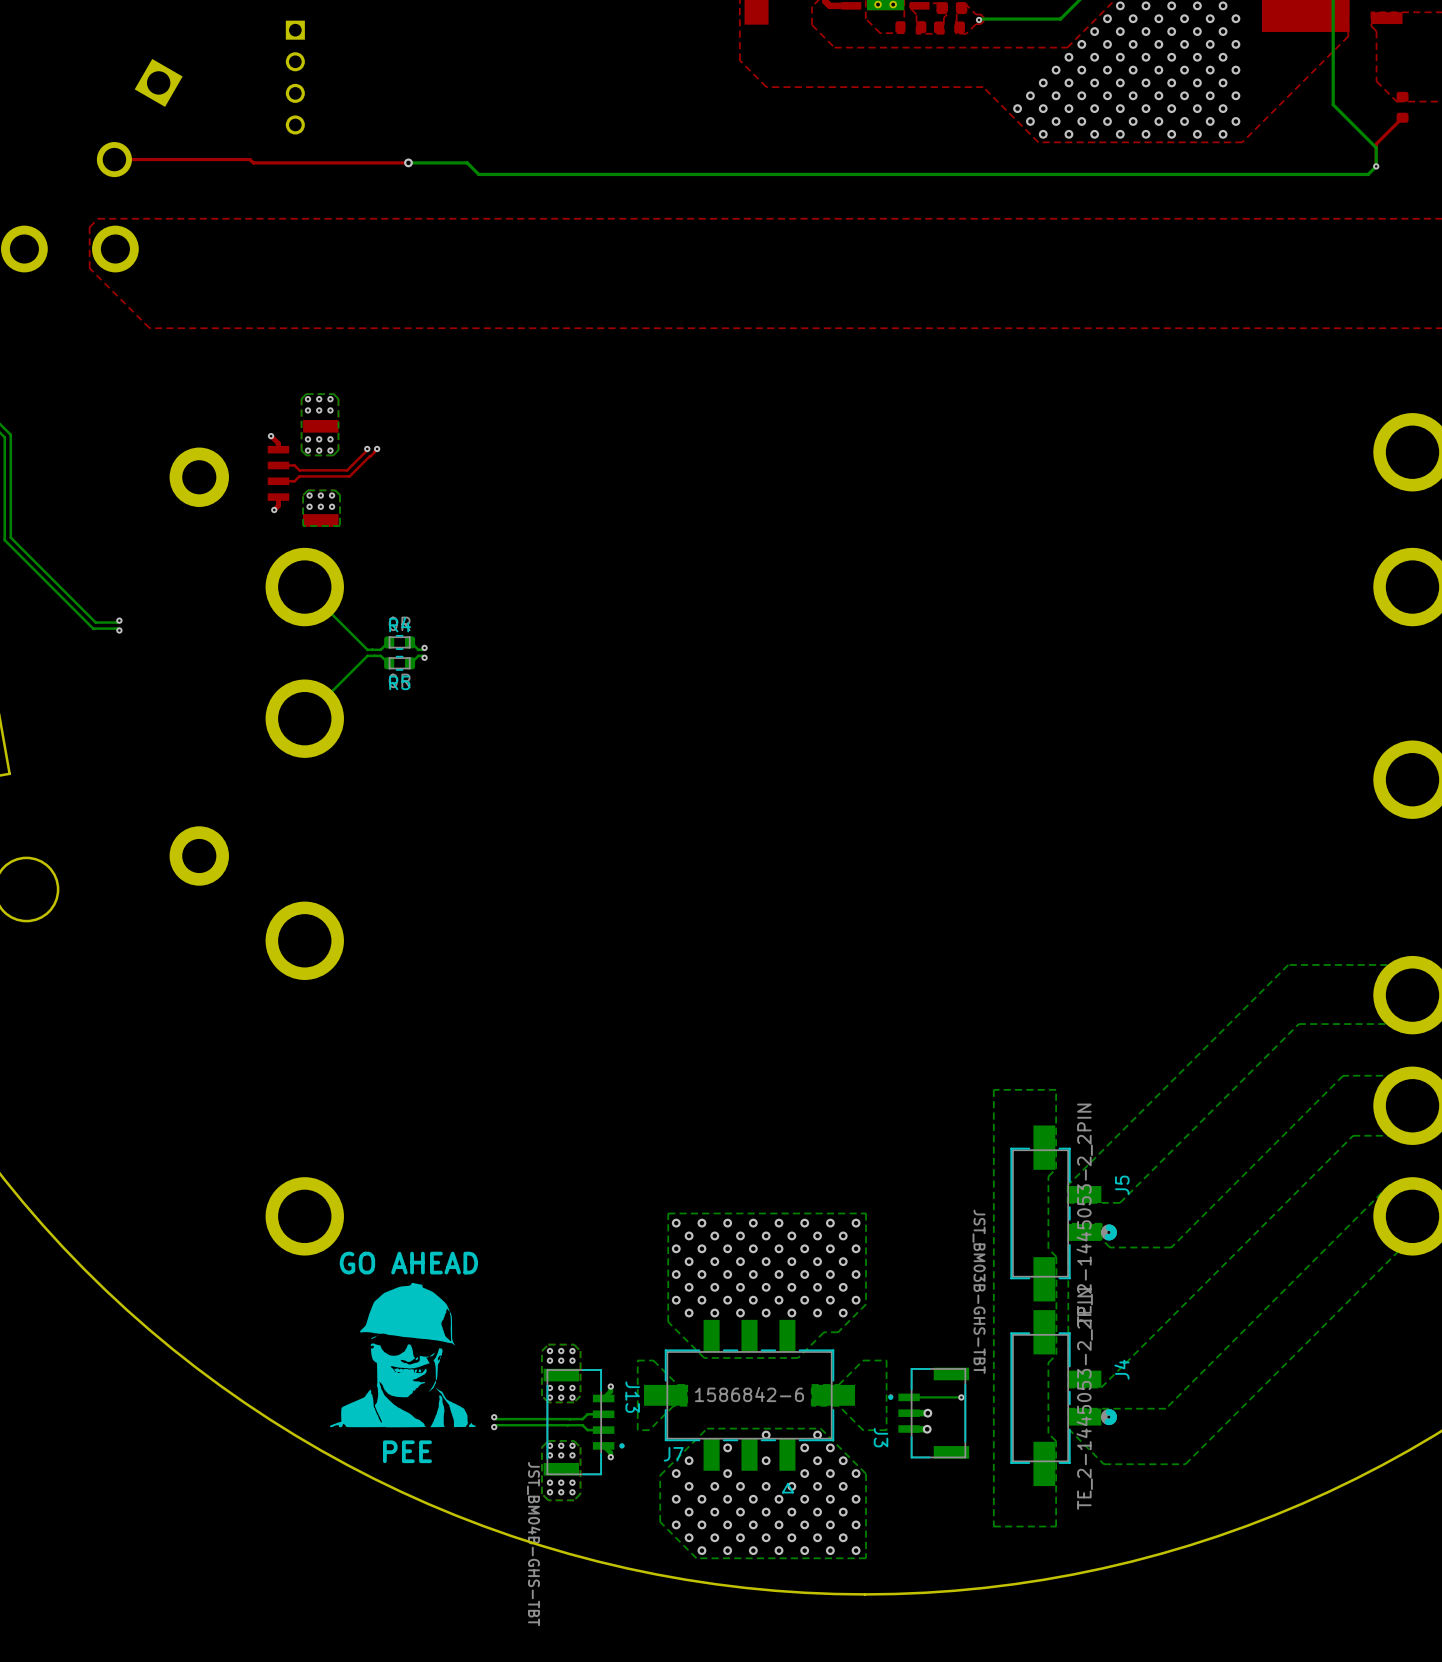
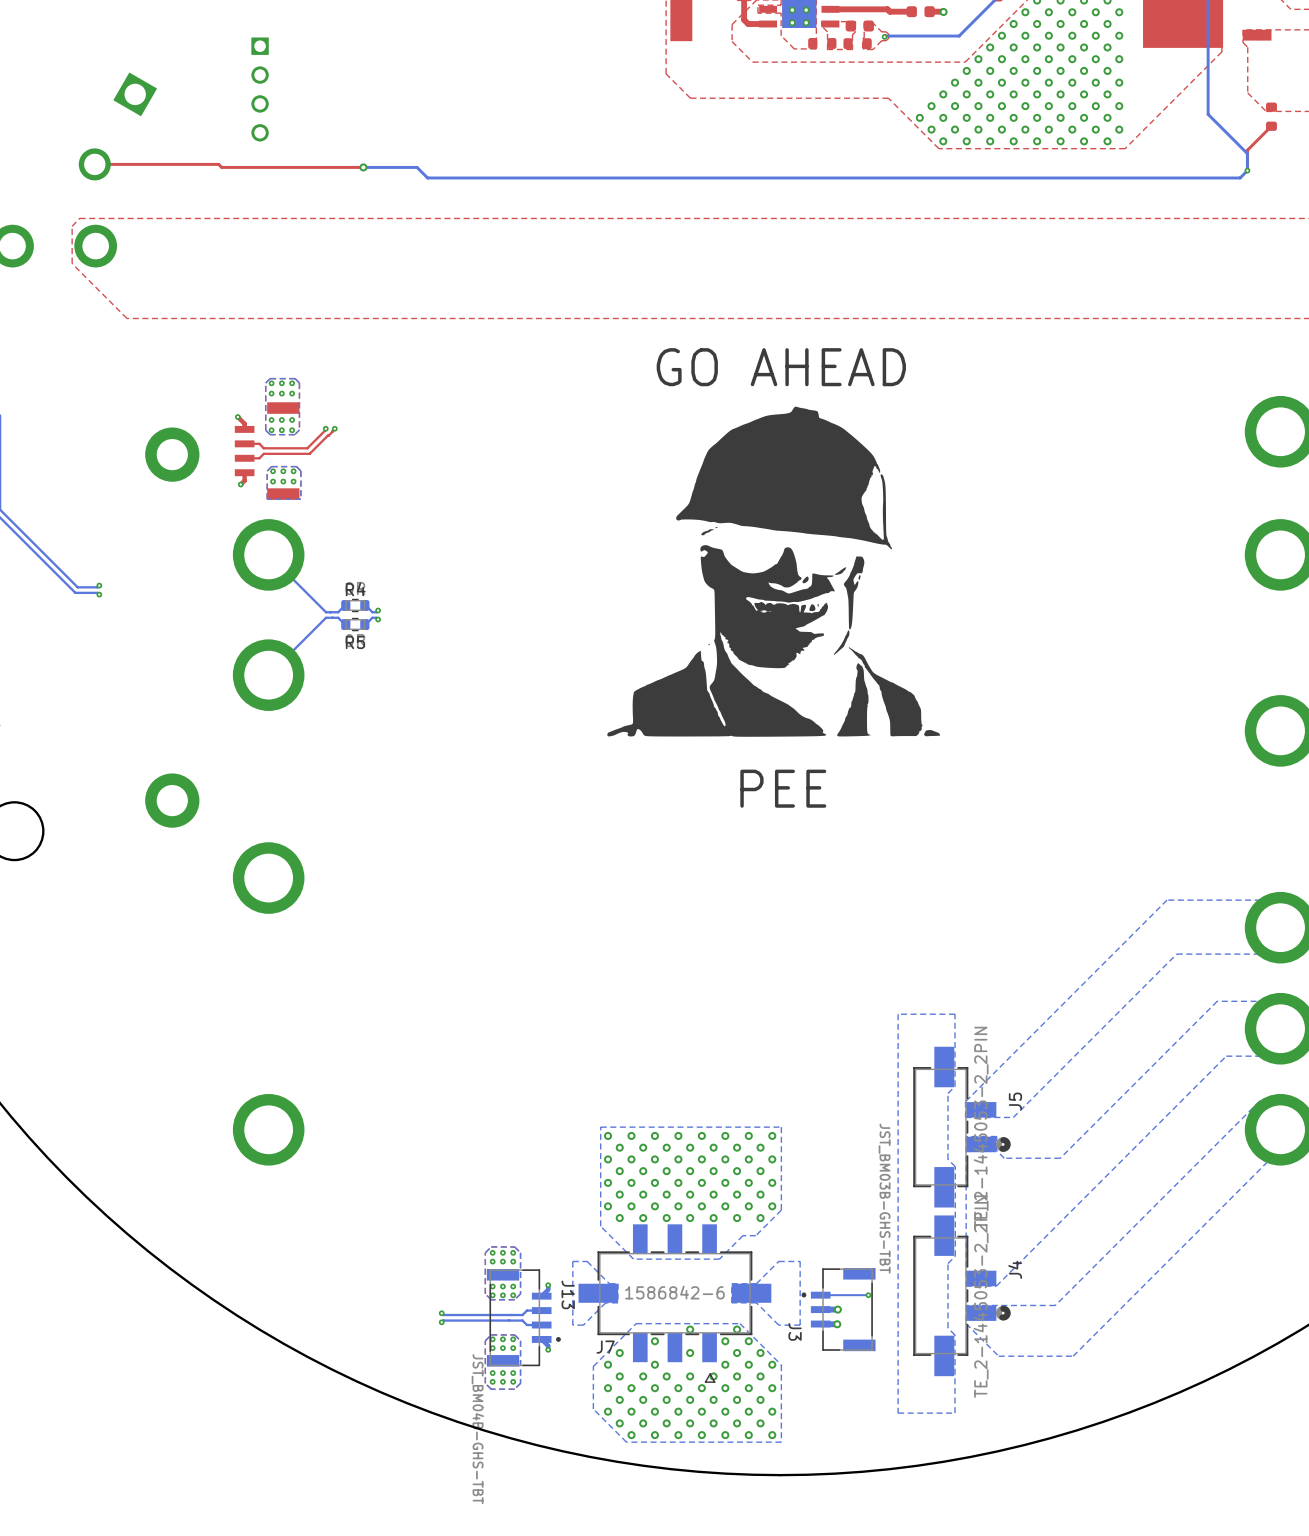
text: none -> GO AHEAD (781, 367)
drawing: none -> [607, 406, 941, 737]
text: none -> PEE (783, 788)
text: GO AHEAD (408, 1263) -> none
drawing: [330, 1282, 476, 1428] -> none
text: PEE (407, 1451) -> none

